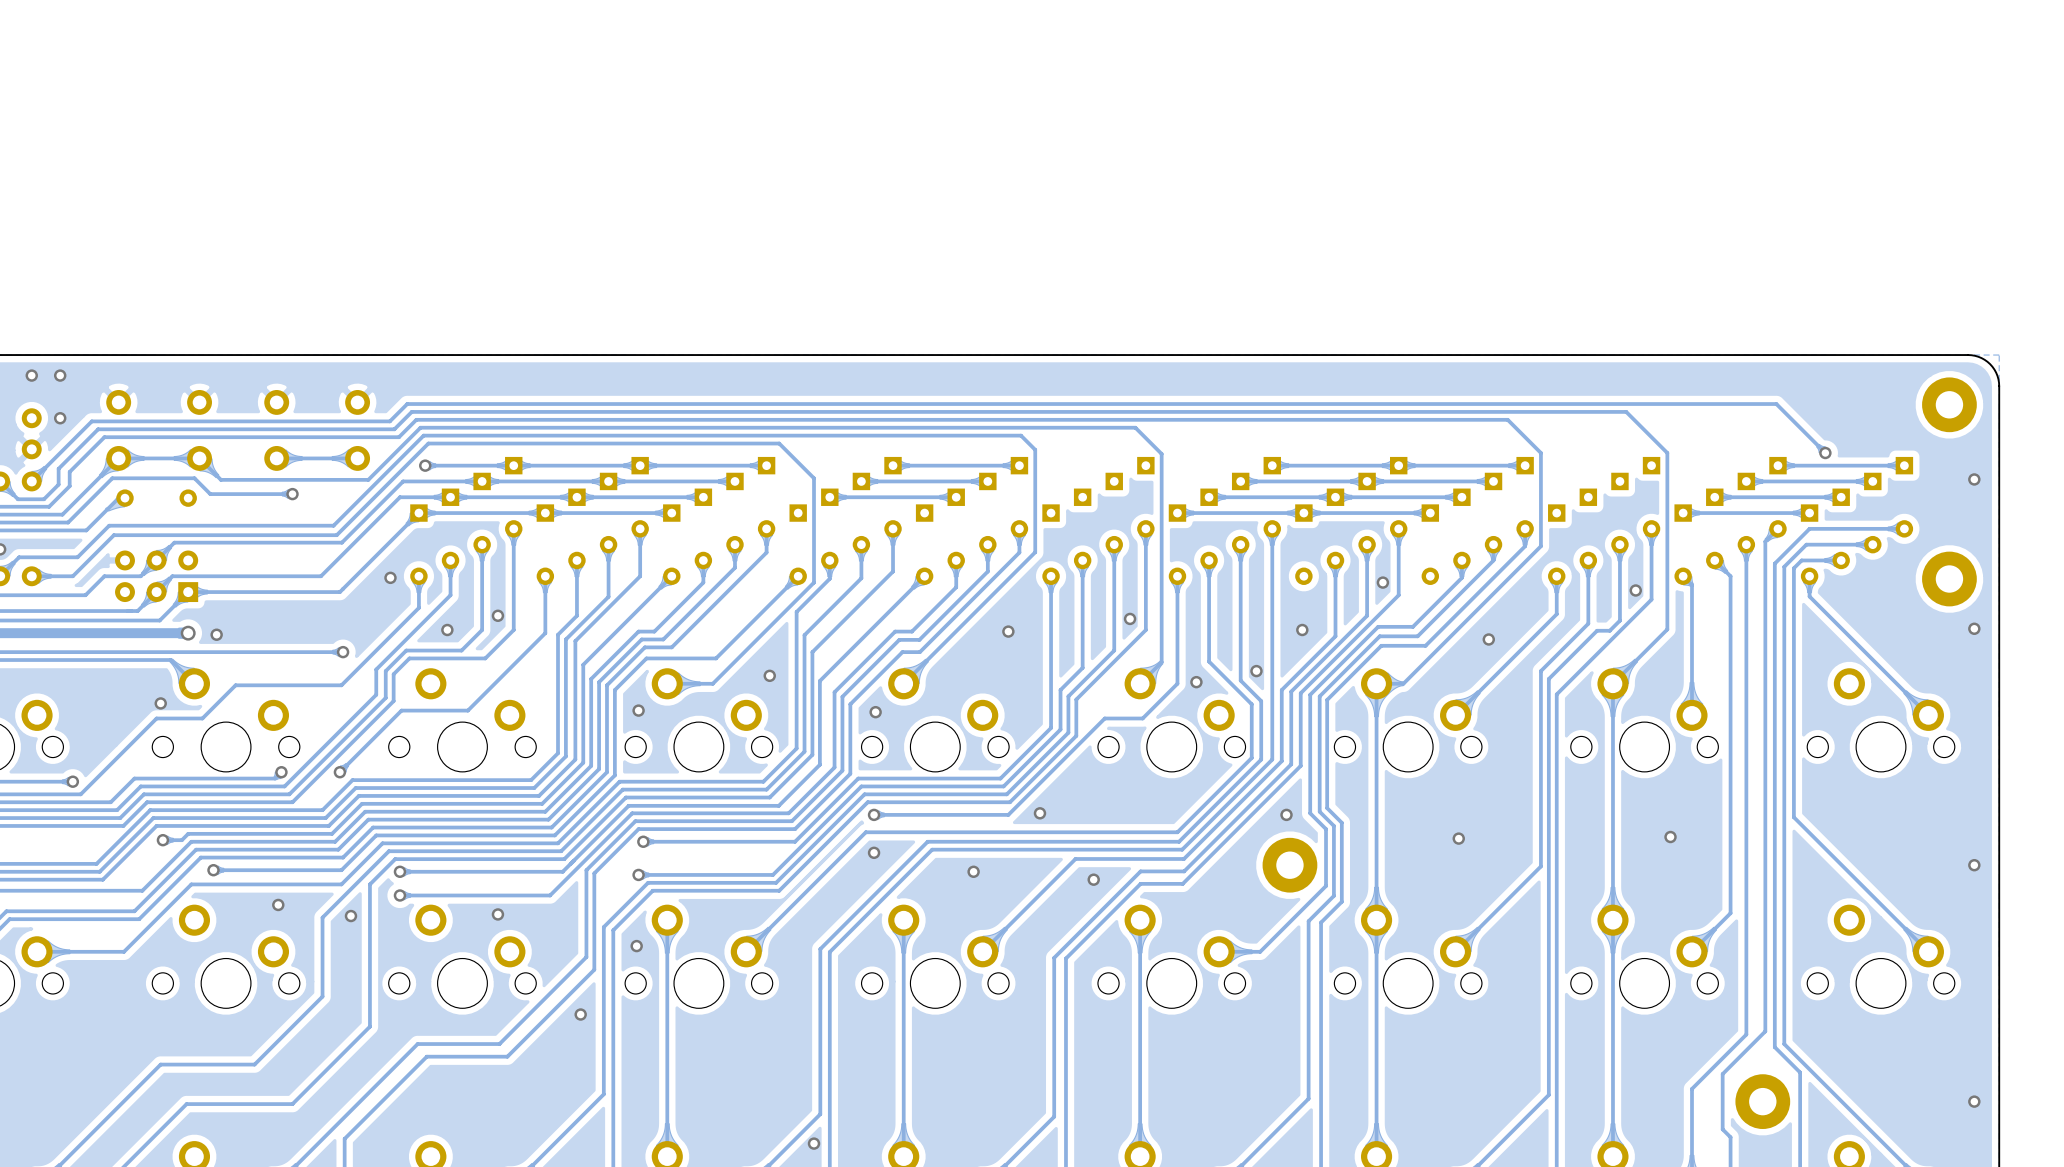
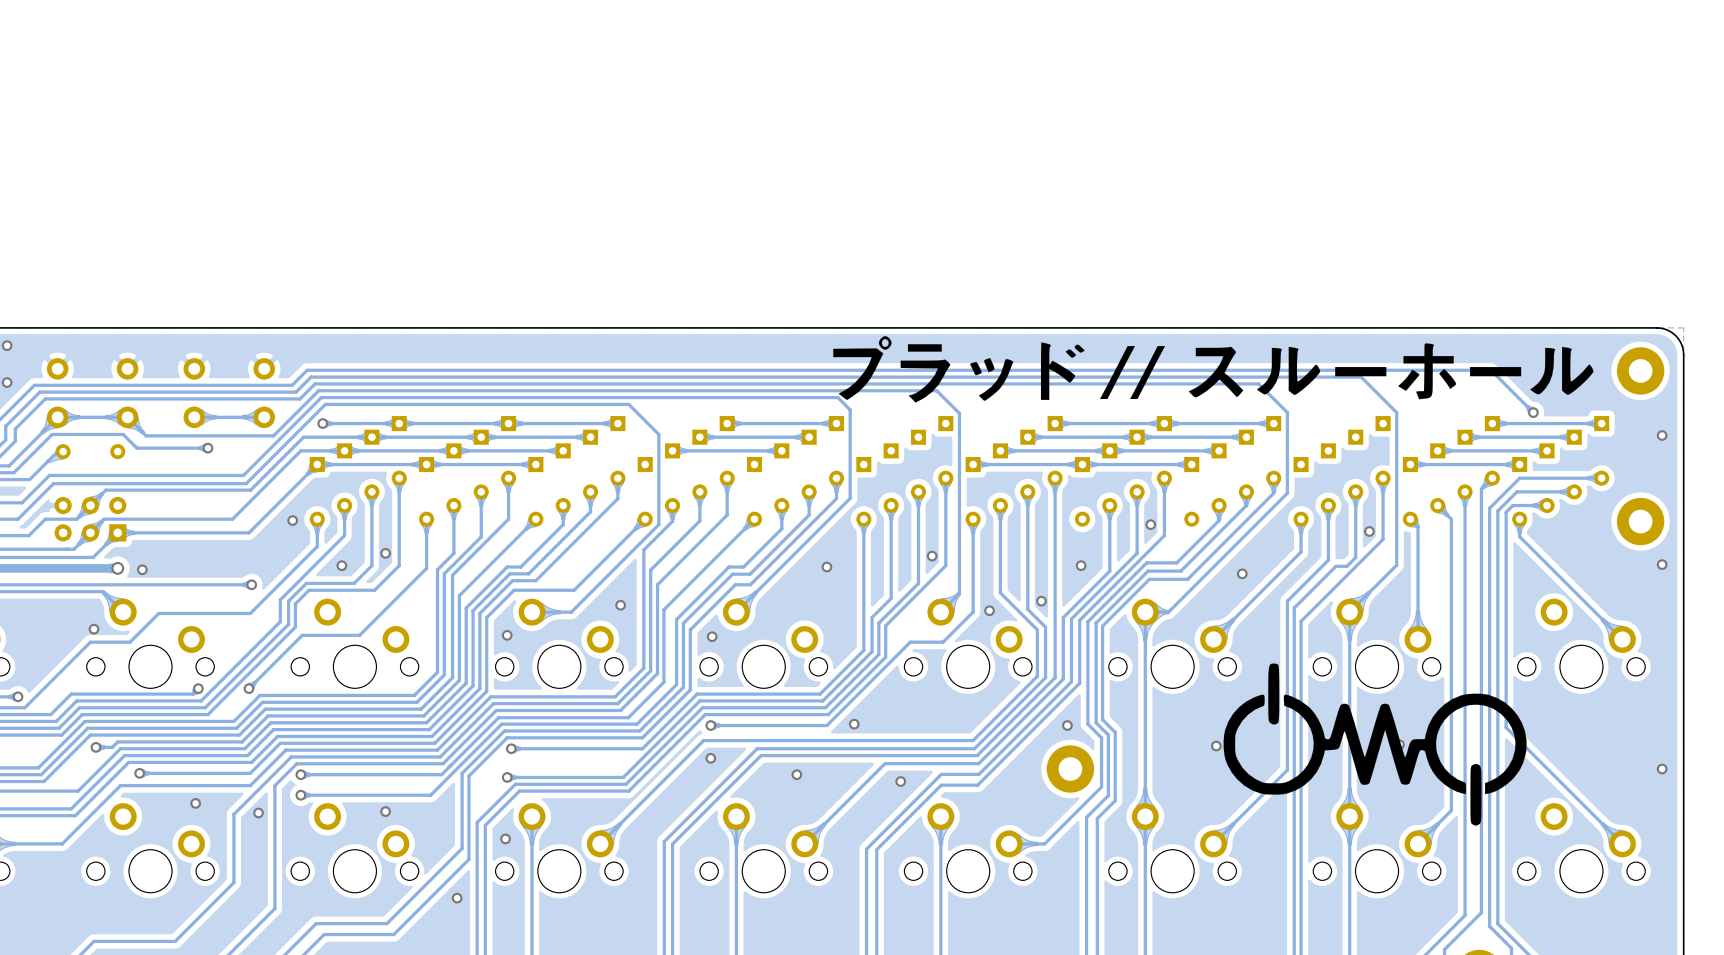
drawing: none -> [833, 336, 1594, 403]
drawing: none -> [1223, 663, 1527, 826]

